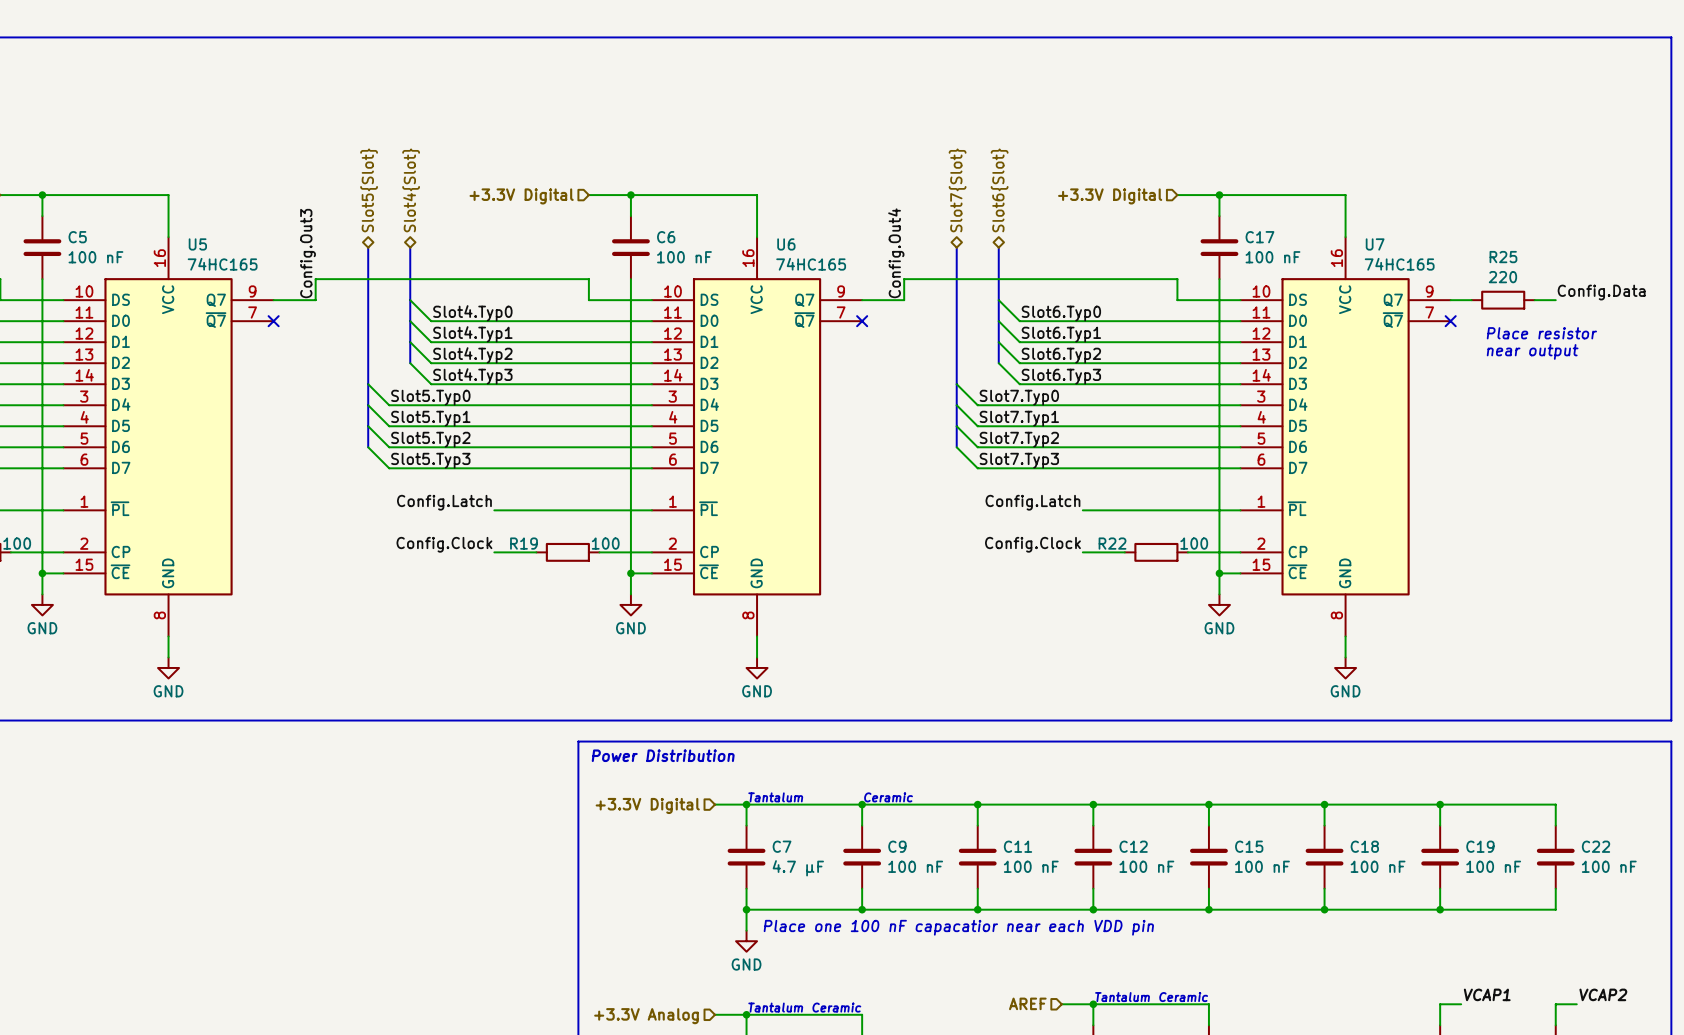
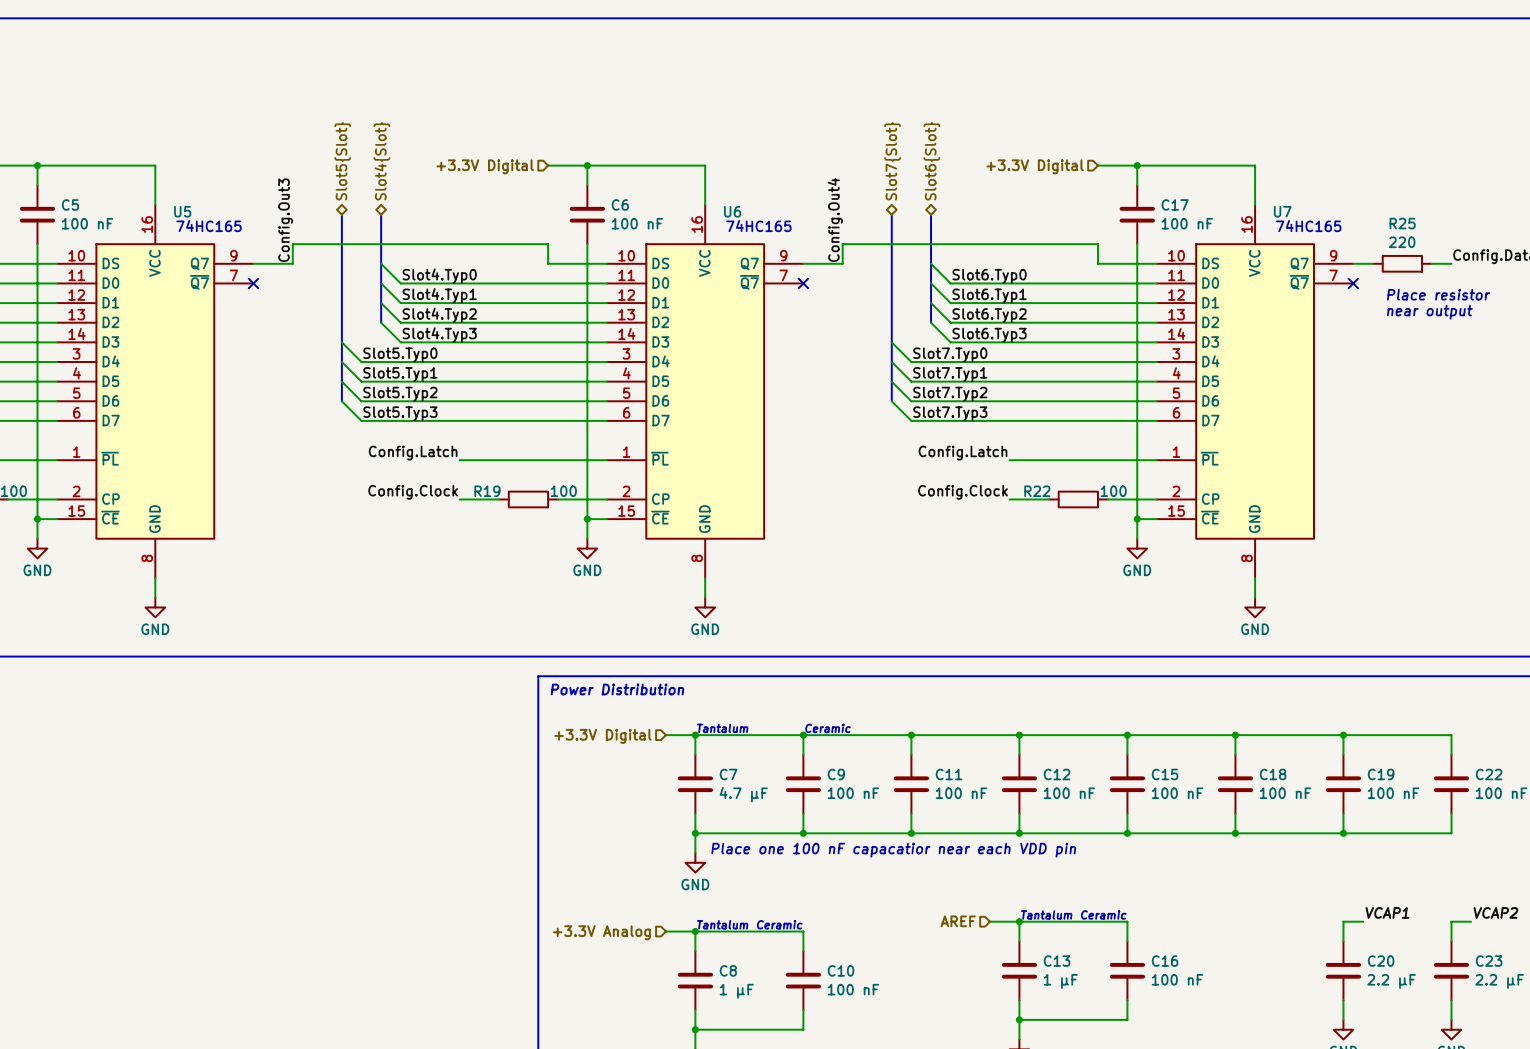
text: none -> 74HC165 (208, 226)
text: none -> 74HC165 (758, 226)
text: none -> 74HC165 (1308, 226)
U5 value: 74HC165 (222, 264) -> none
U6 value: 74HC165 (811, 264) -> none
U7 value: 74HC165 (1399, 264) -> none

